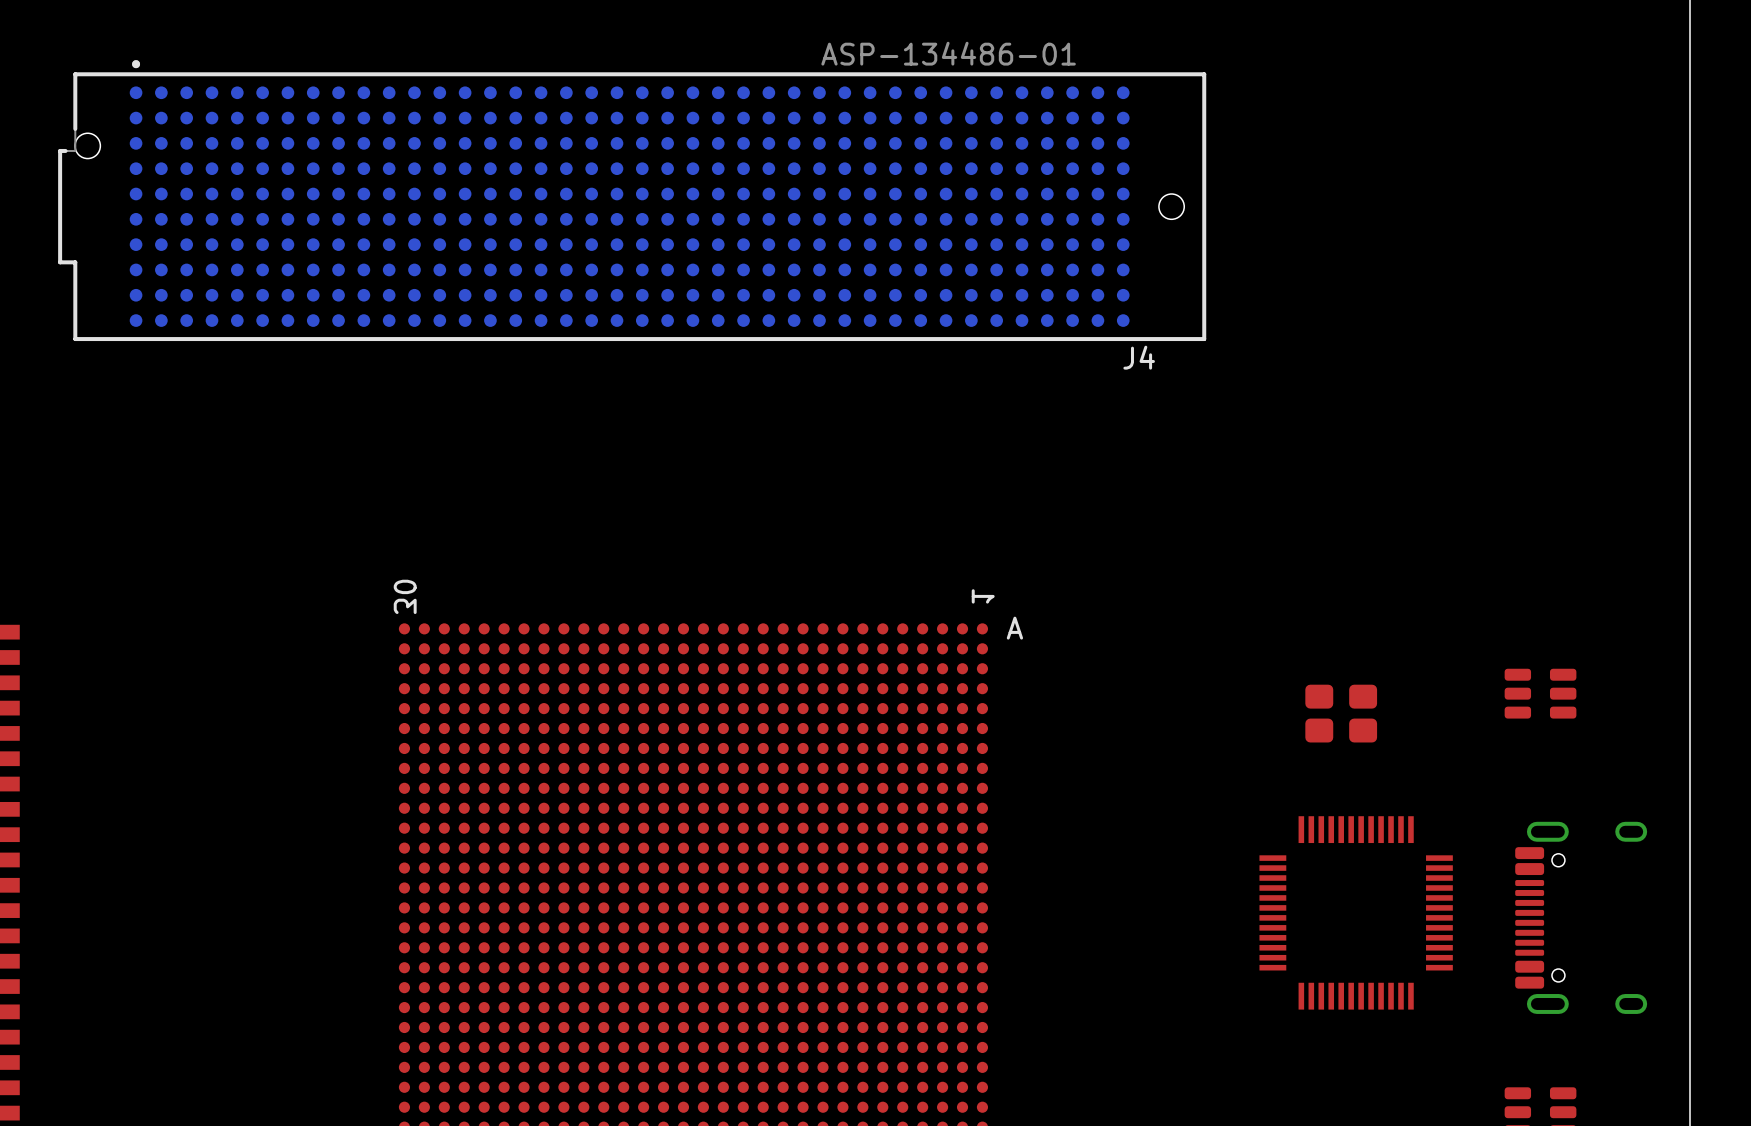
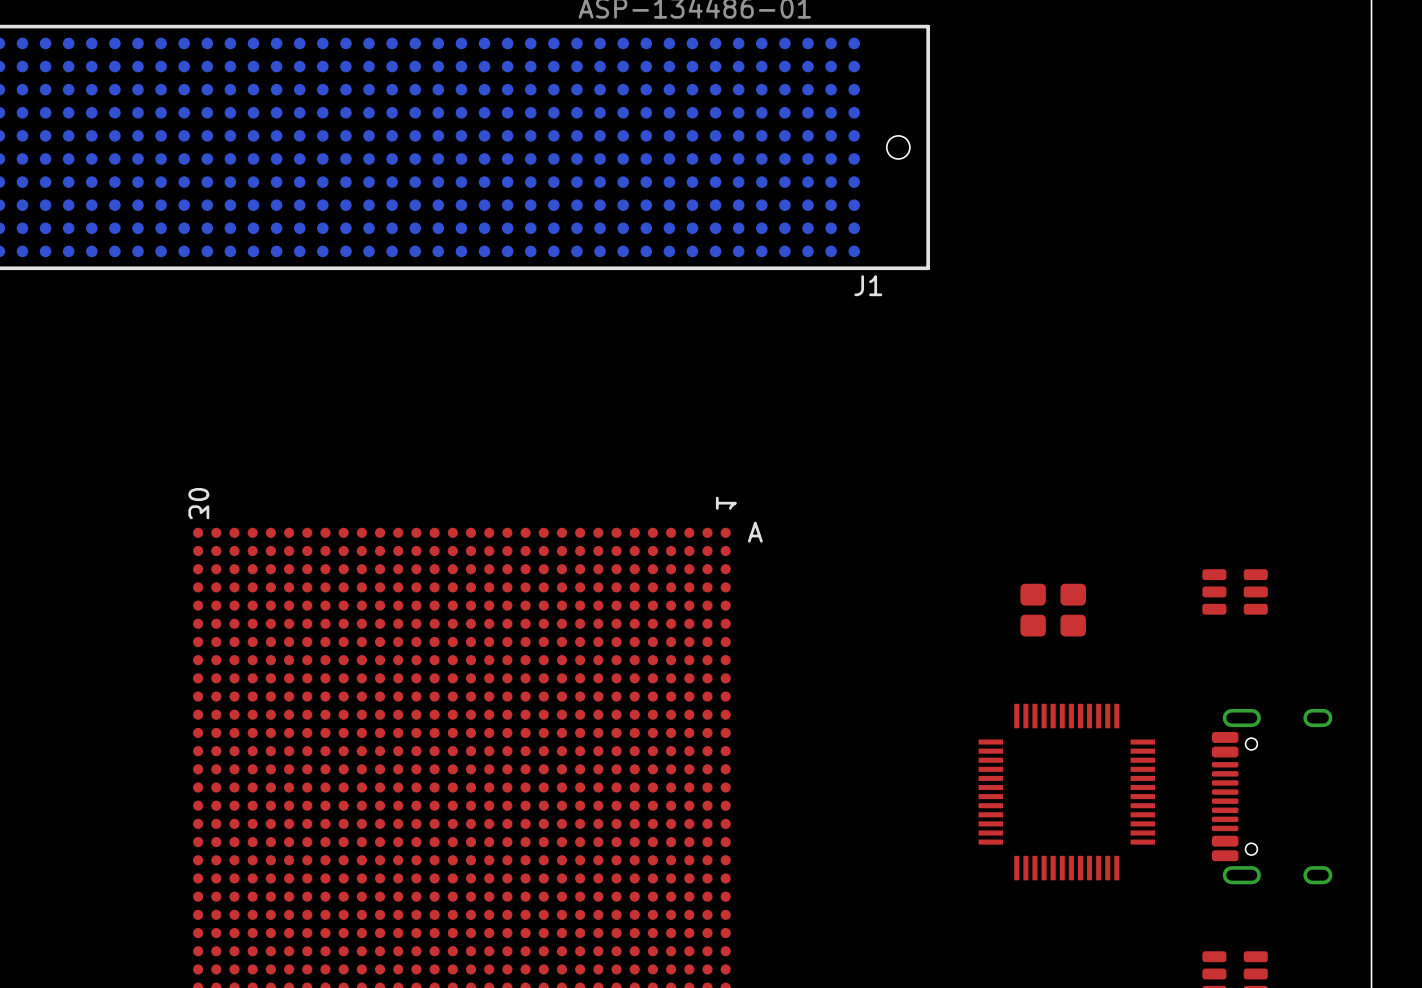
J4 name: J4 (1139, 357) -> J1 (868, 285)

